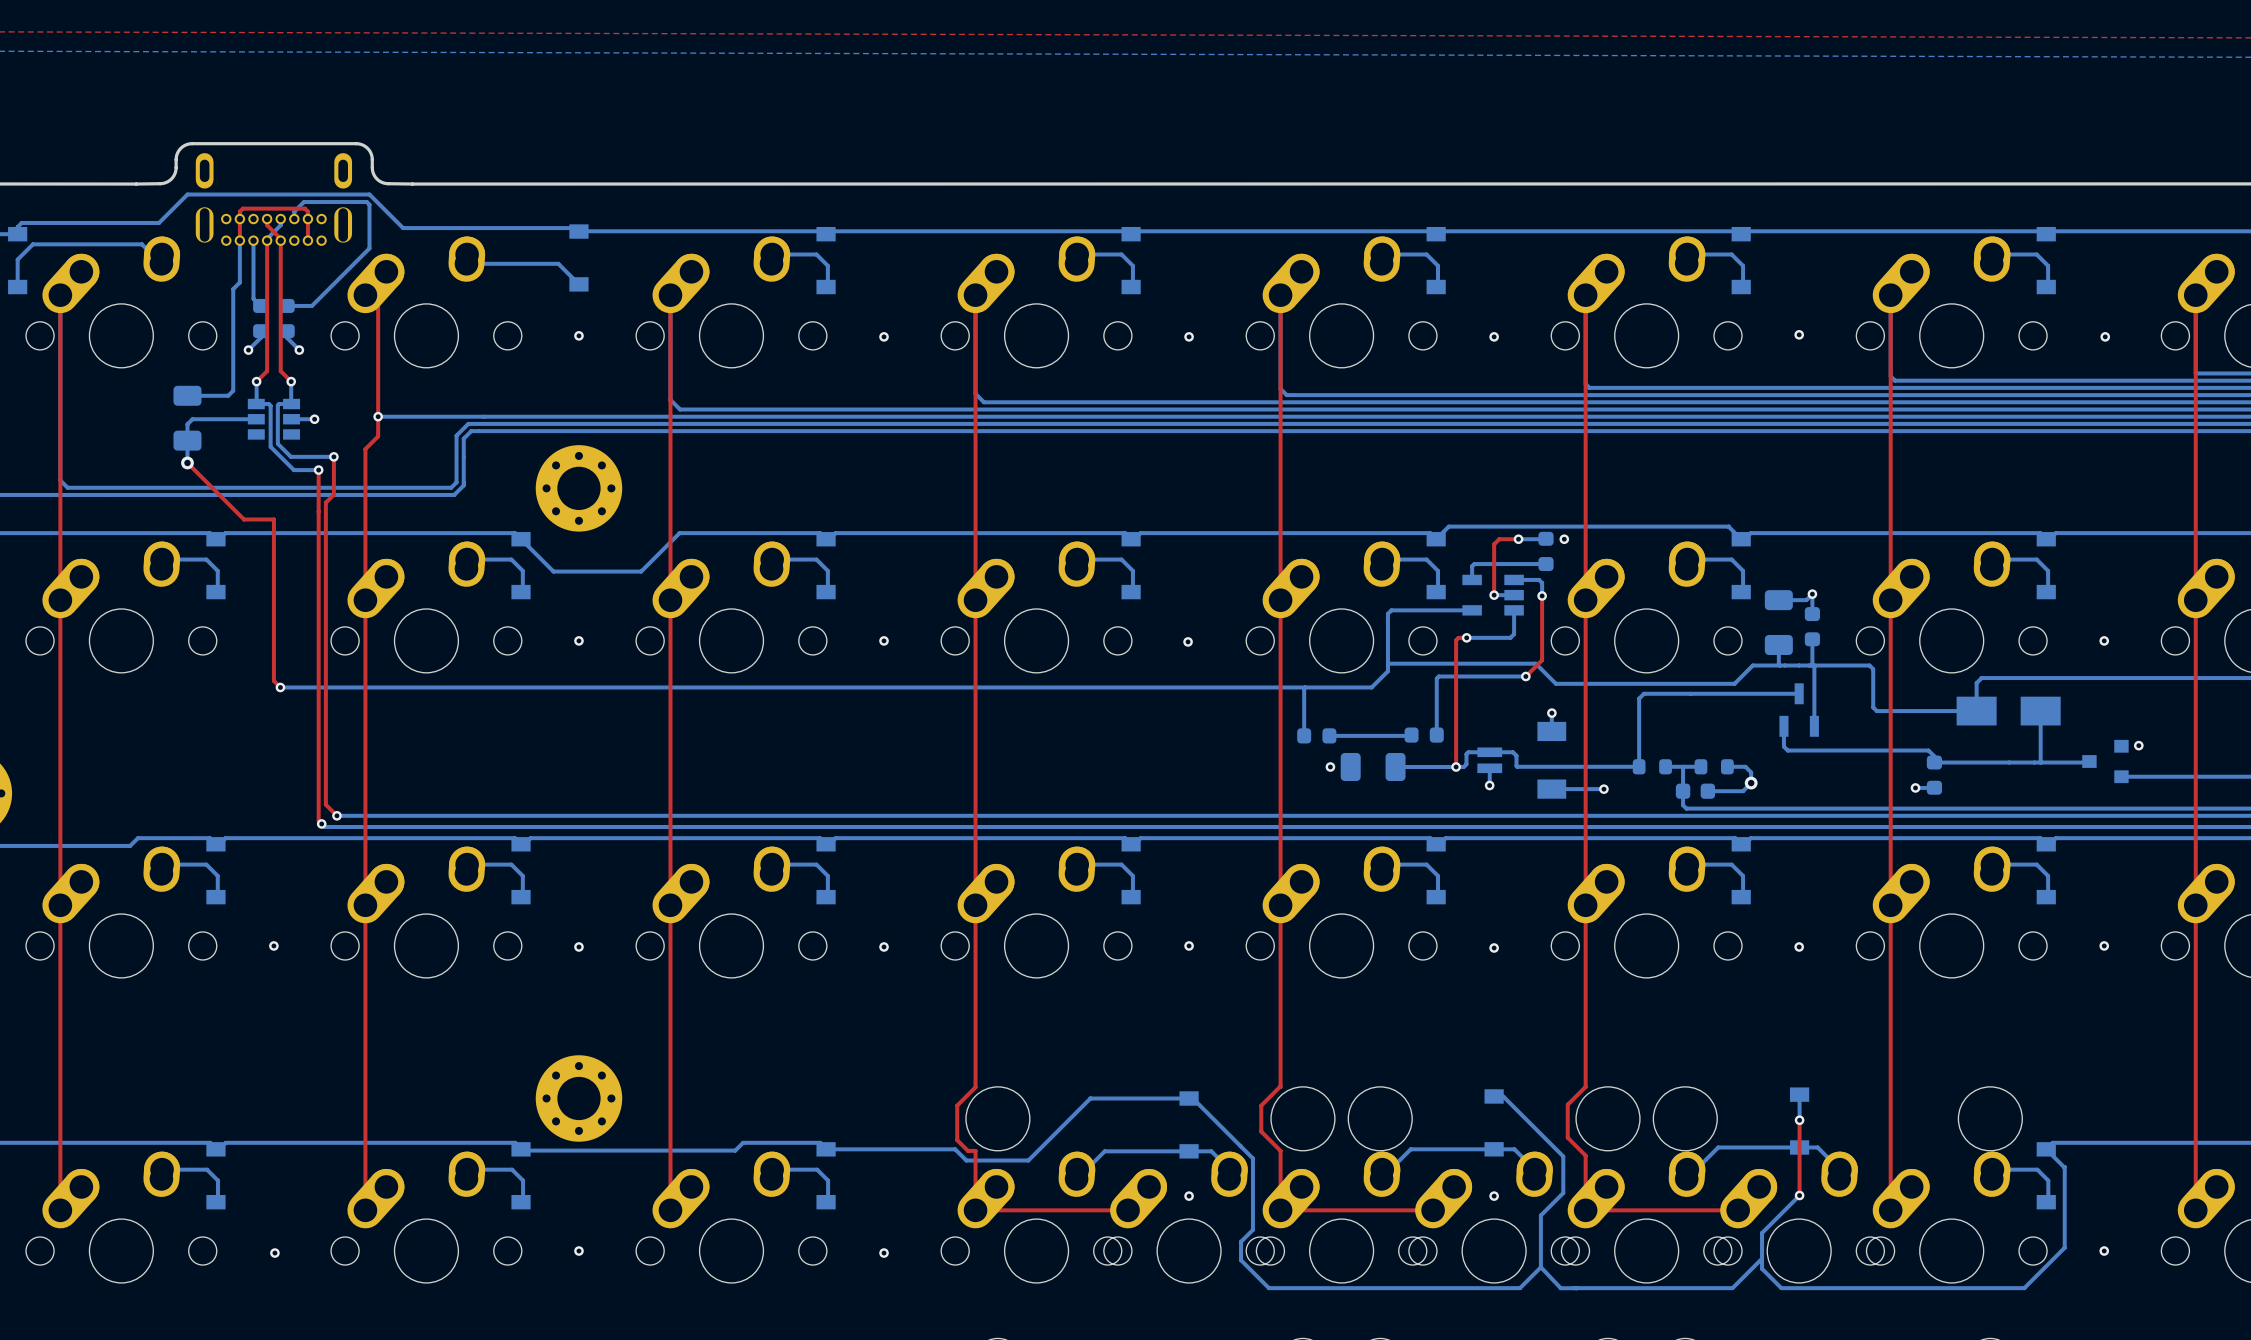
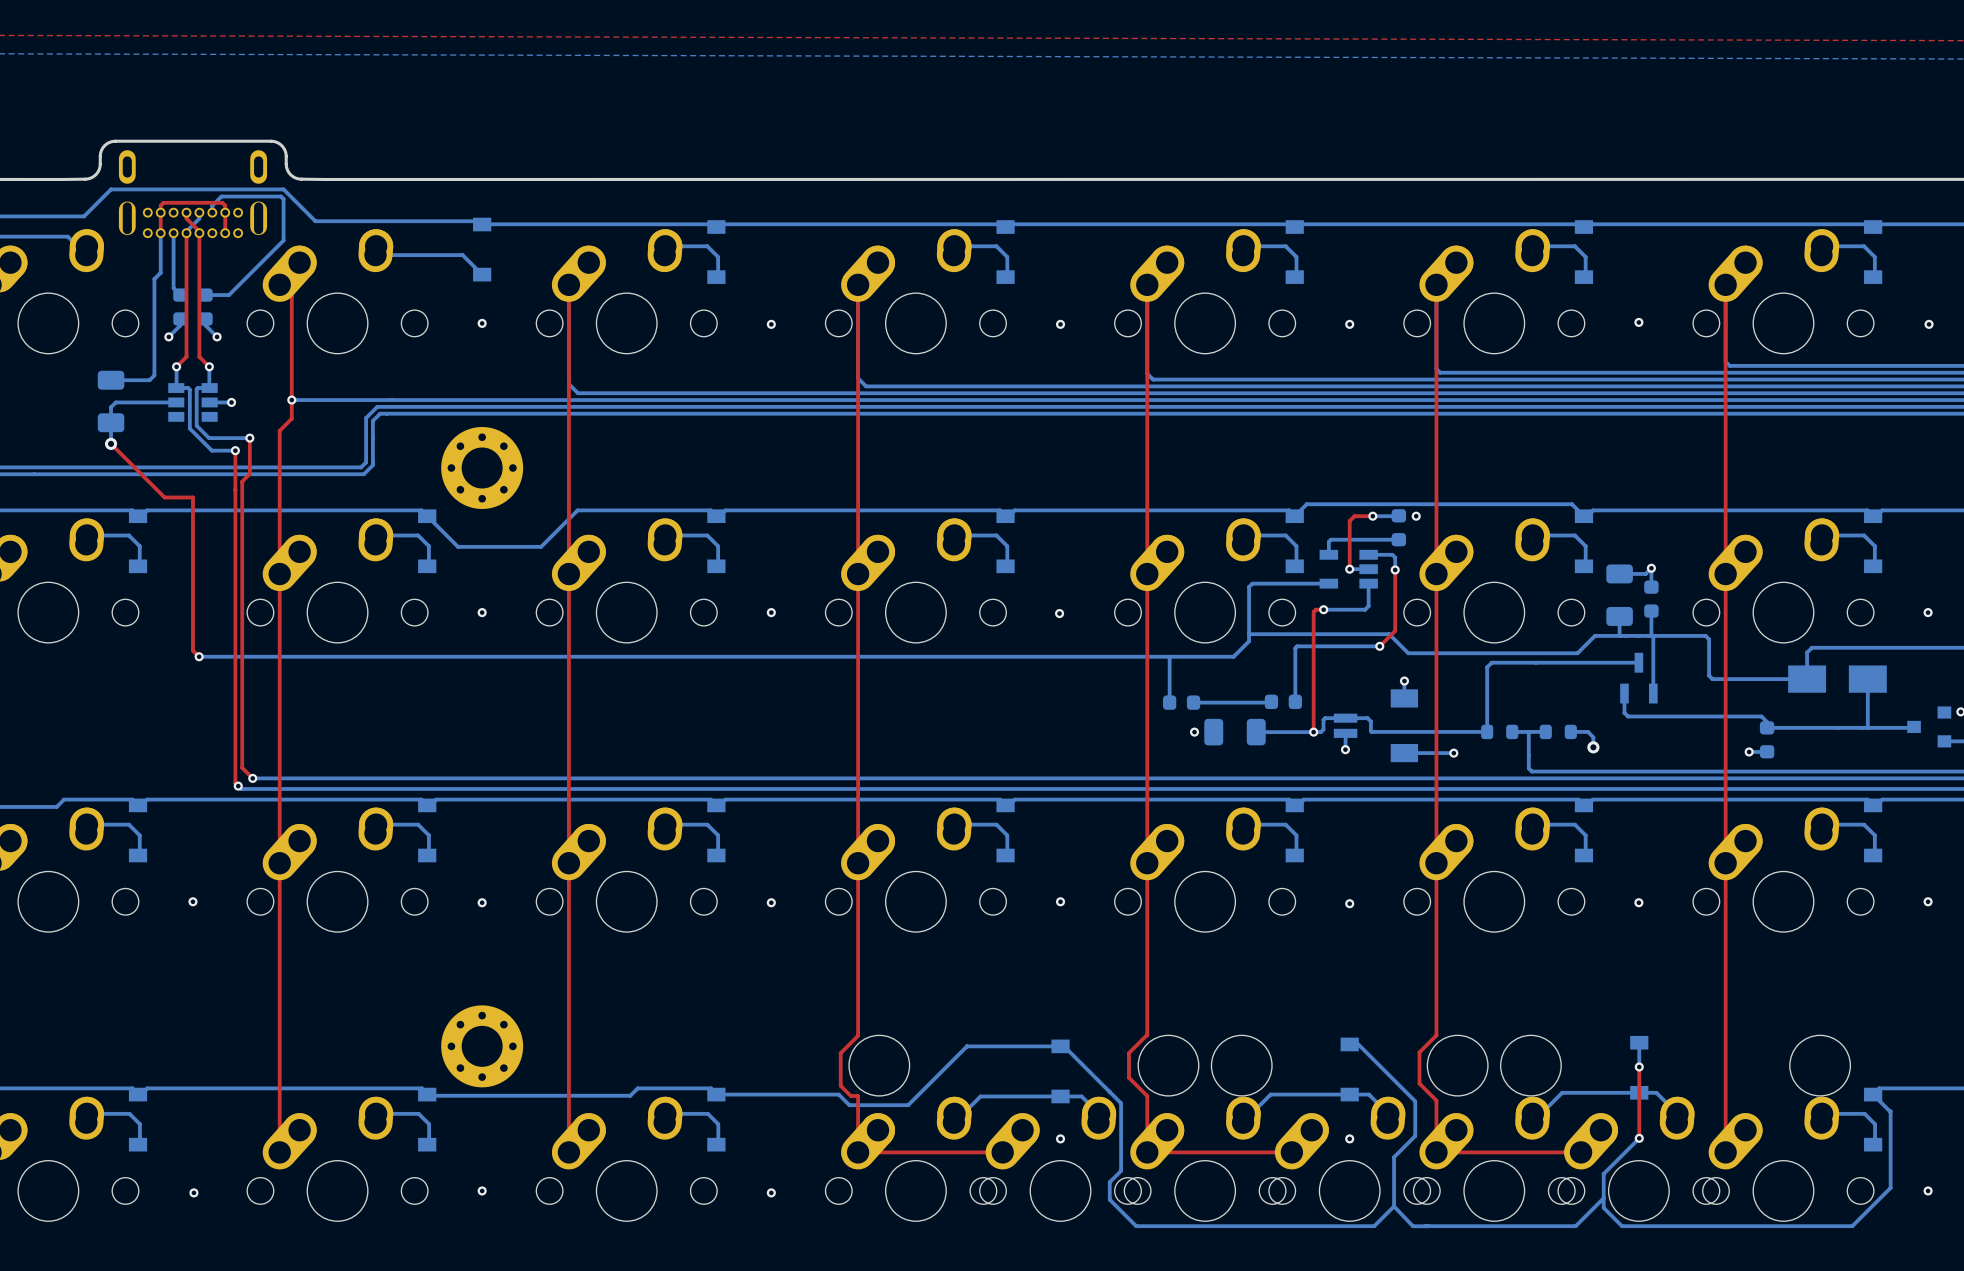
bottom track: (1751, 783) (1743, 791) (1707, 791) -> none
part: (1695, 791) -> none

